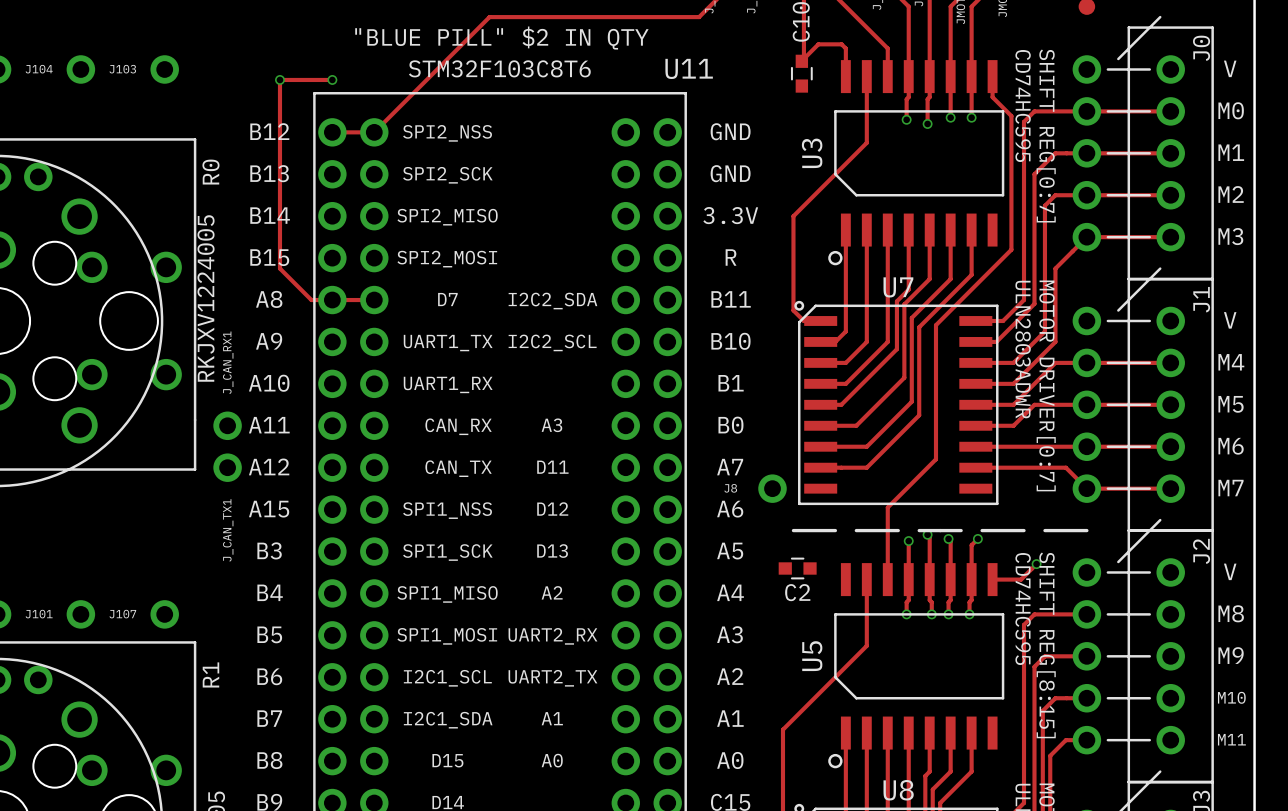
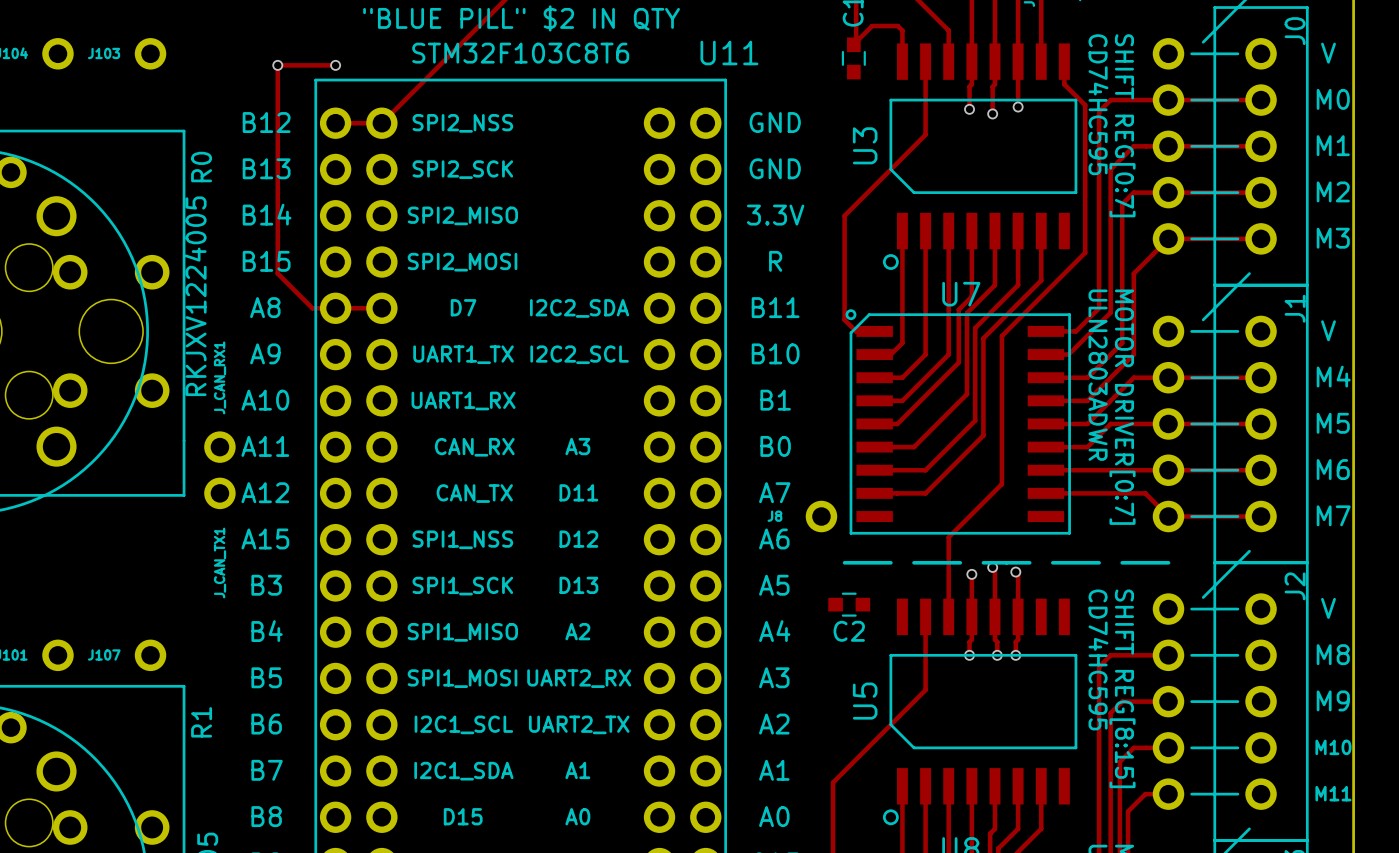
track: (971, 76) (971, 117) -> none
via: (971, 117) -> none
track: (977, 538) (971, 545) (971, 600) (969, 602) (969, 614) -> none
via: (977, 538) -> none
track: (1036, 564) (1021, 579) (992, 579) -> none
via: (1036, 564) -> none
via: (969, 614) -> none

